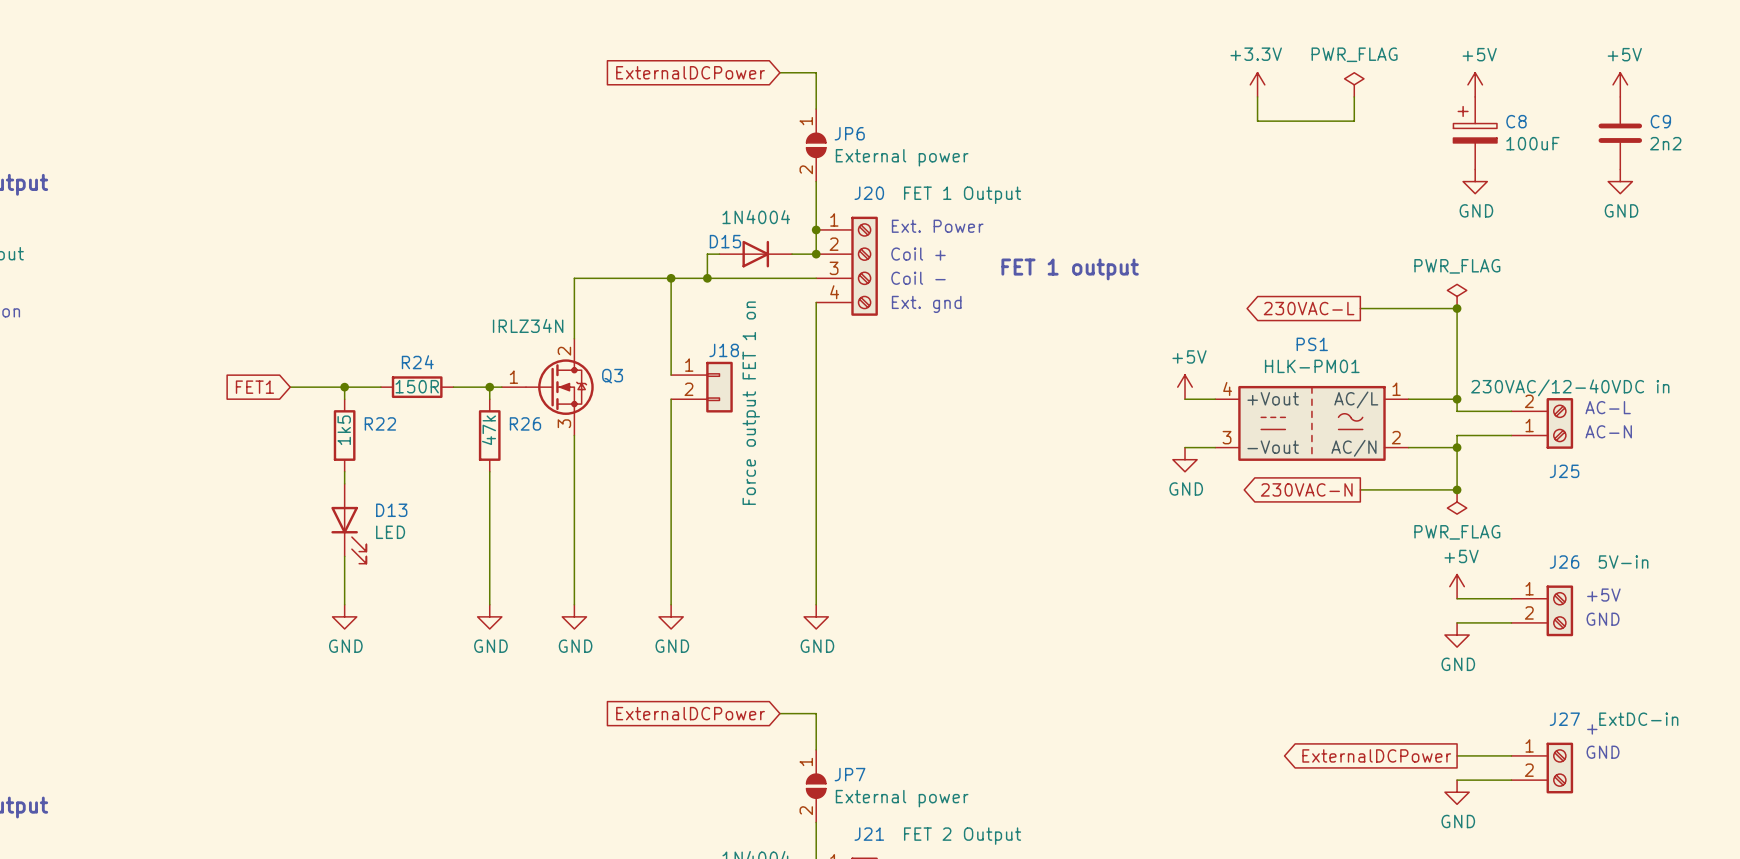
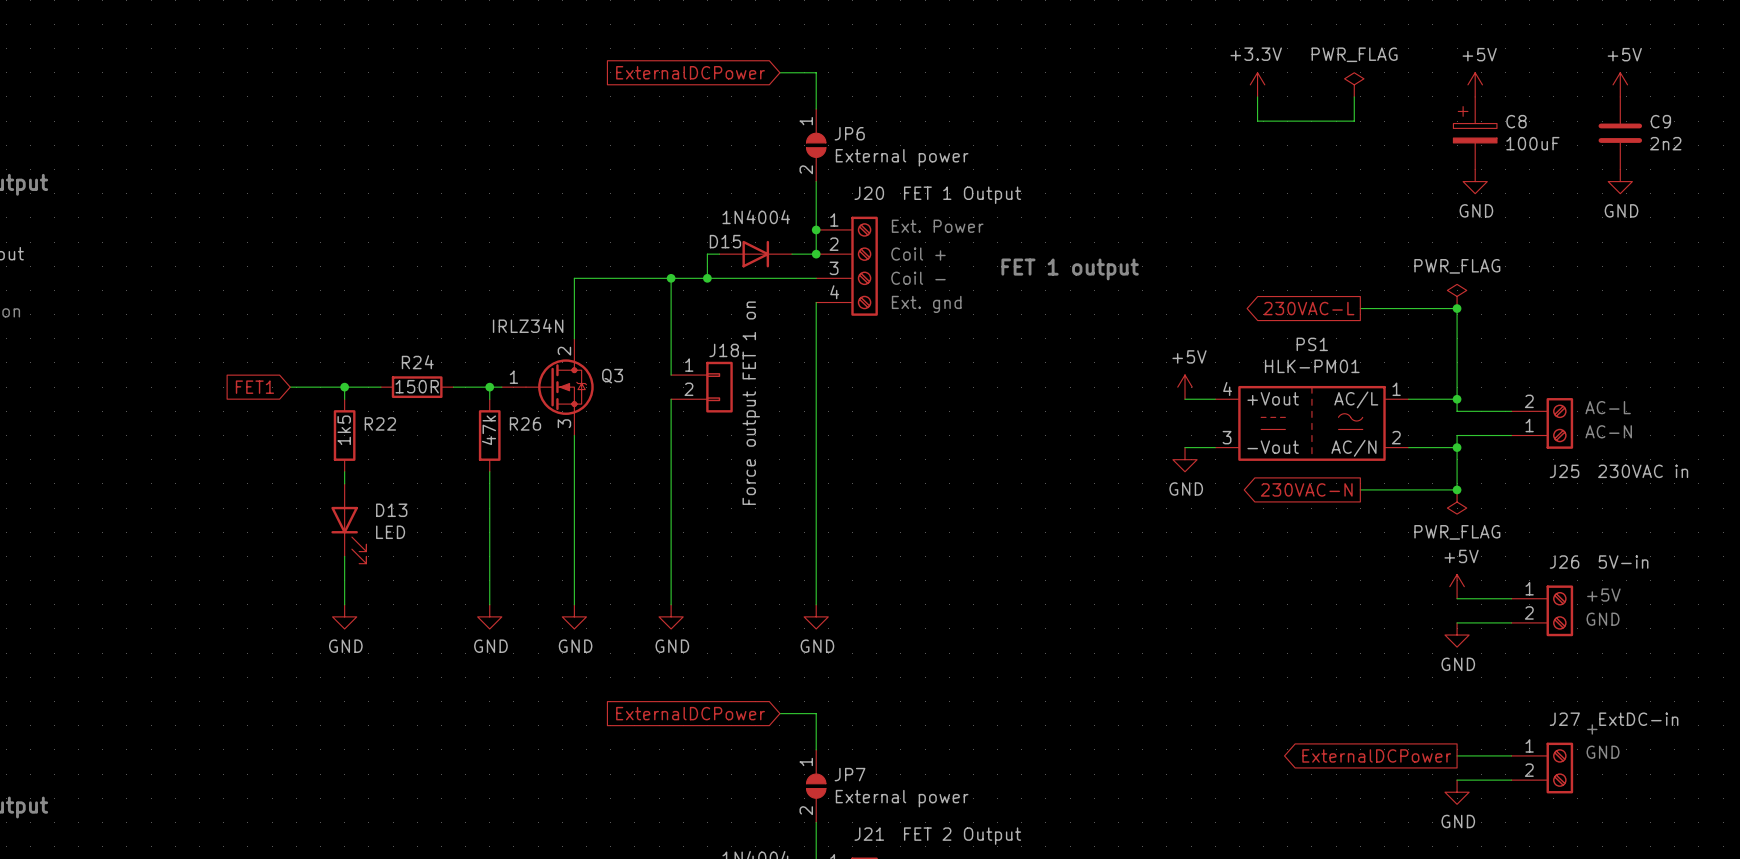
J25 value: 230VAC/12-40VDC in (1570, 387) -> 230VAC in (1643, 471)

